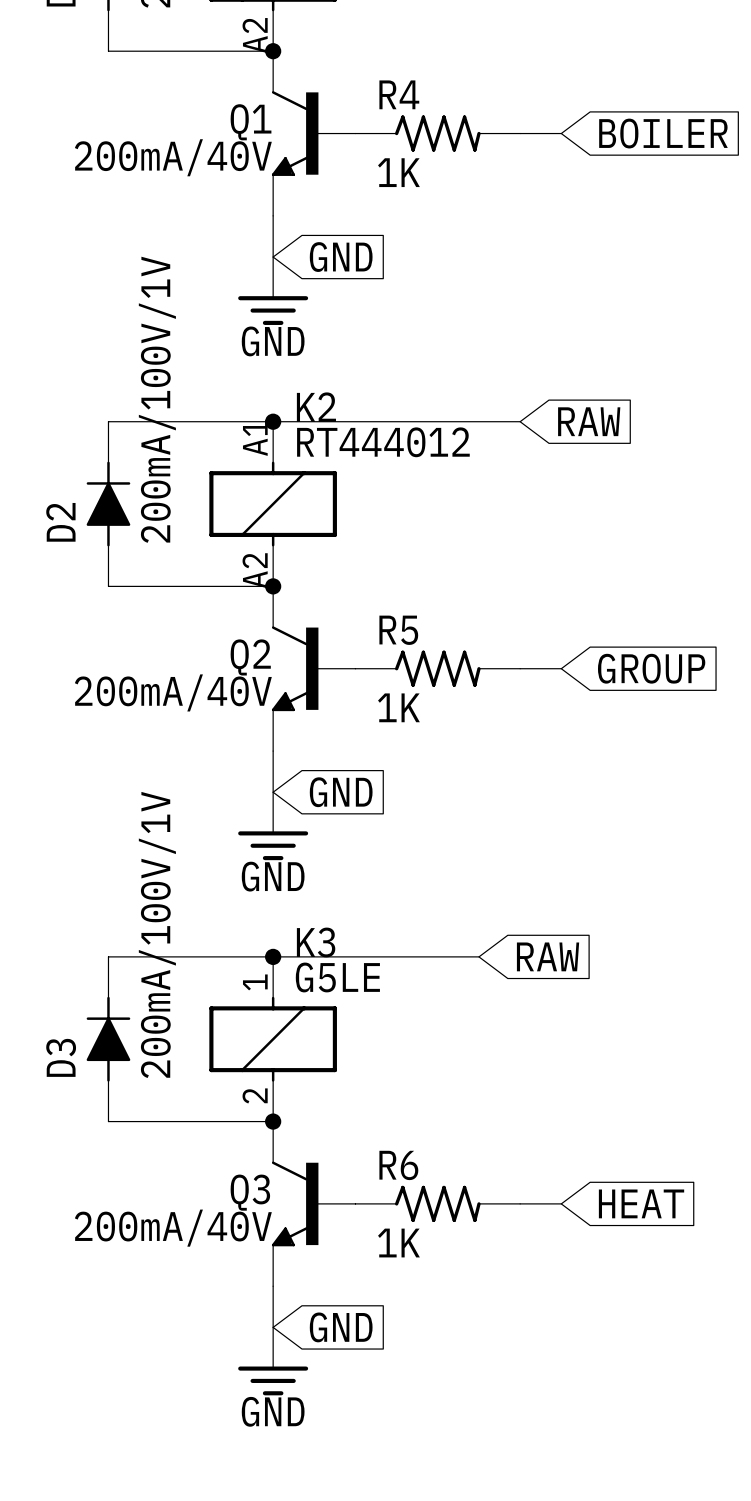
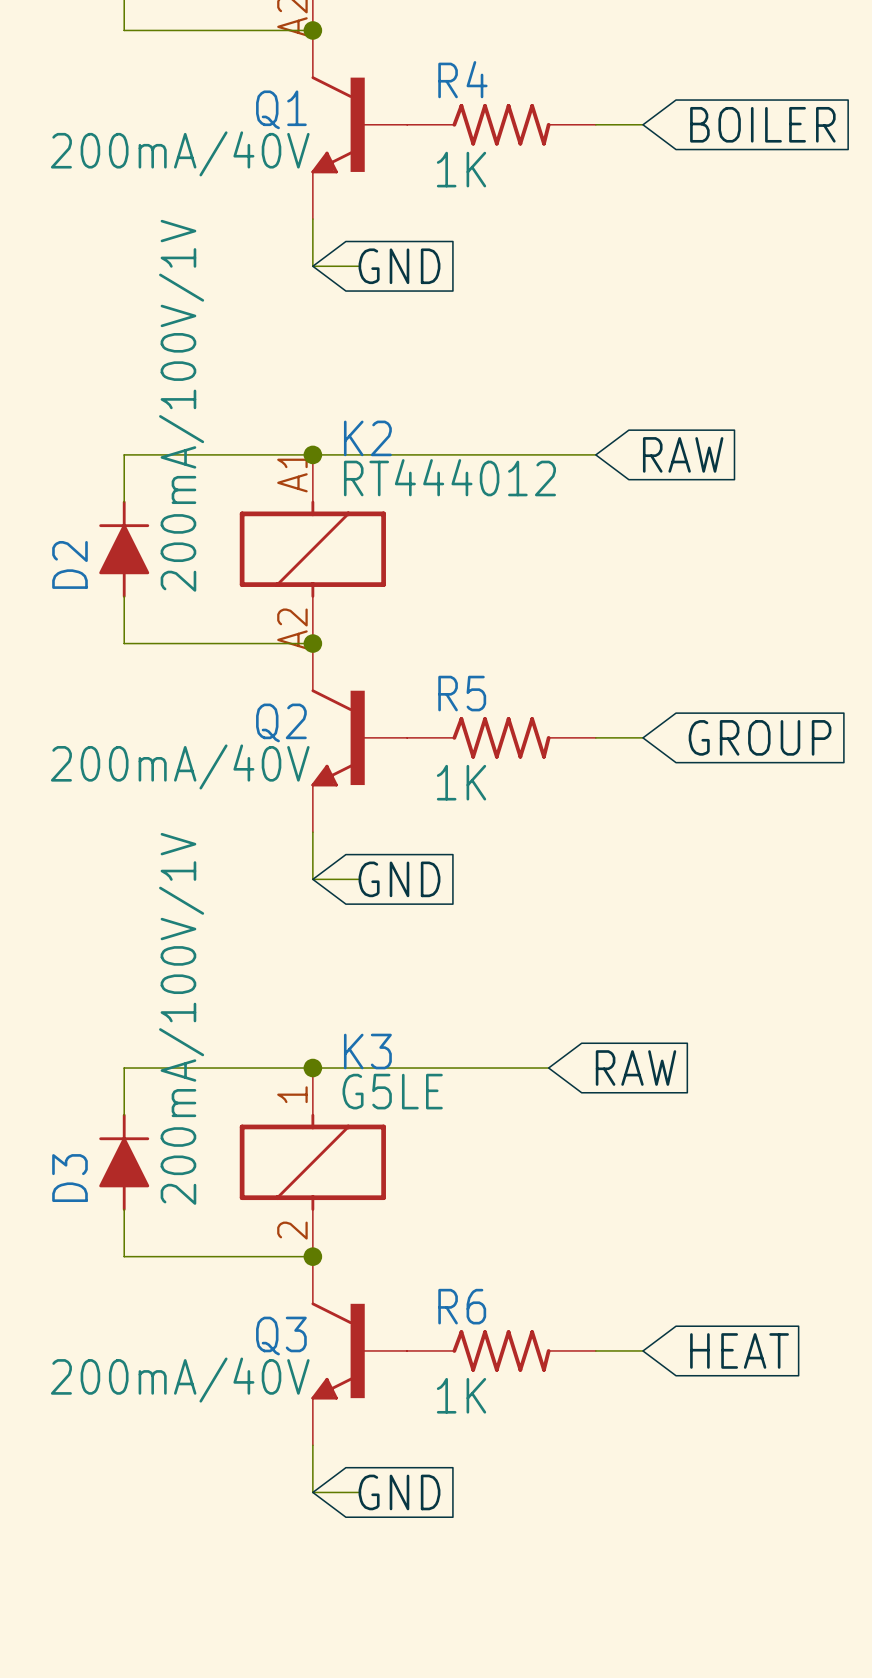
wire: none -> (312, 266) (360, 266)
power symbol: GND (273, 291) -> none
wire: none -> (312, 879) (360, 879)
power symbol: GND (273, 826) -> none
wire: none -> (312, 1492) (360, 1492)
power symbol: GND (273, 1361) -> none

